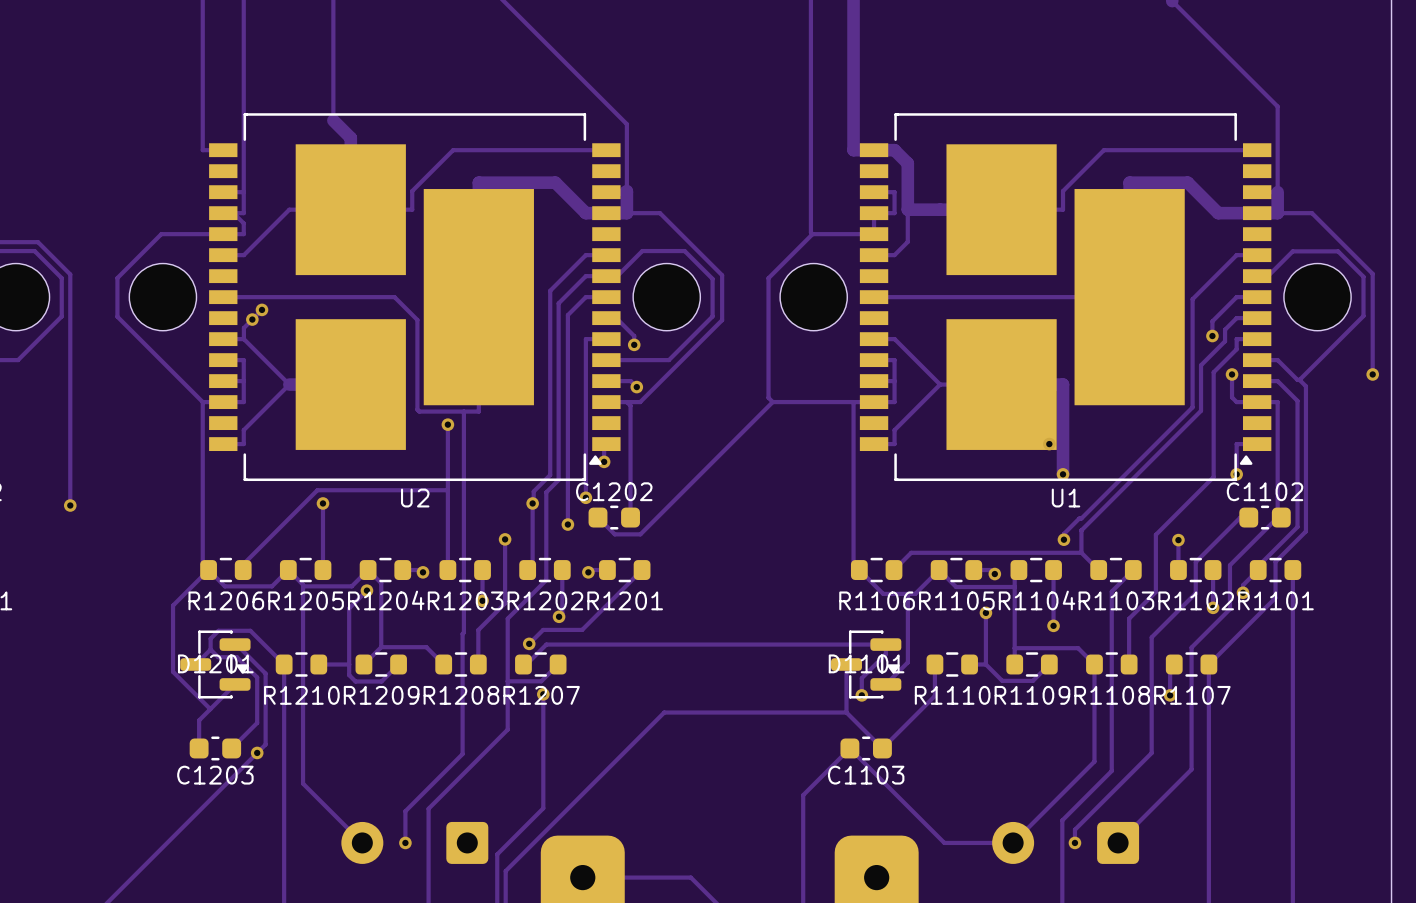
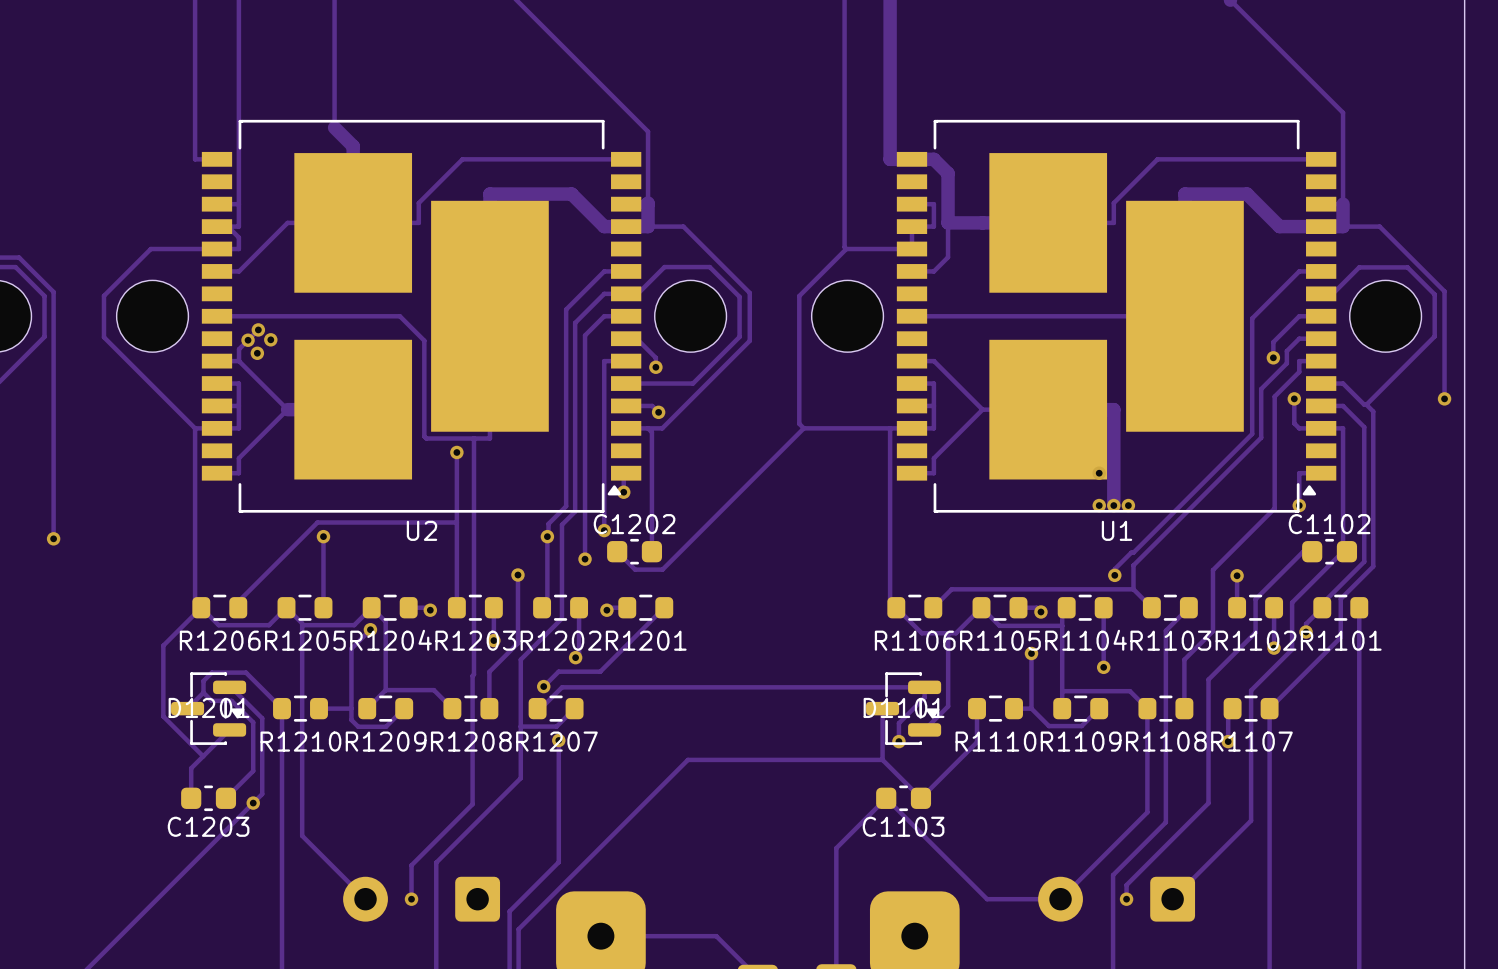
via: none -> (270, 339)
via: none -> (257, 353)
via: none -> (1099, 505)
via: none -> (1128, 505)

